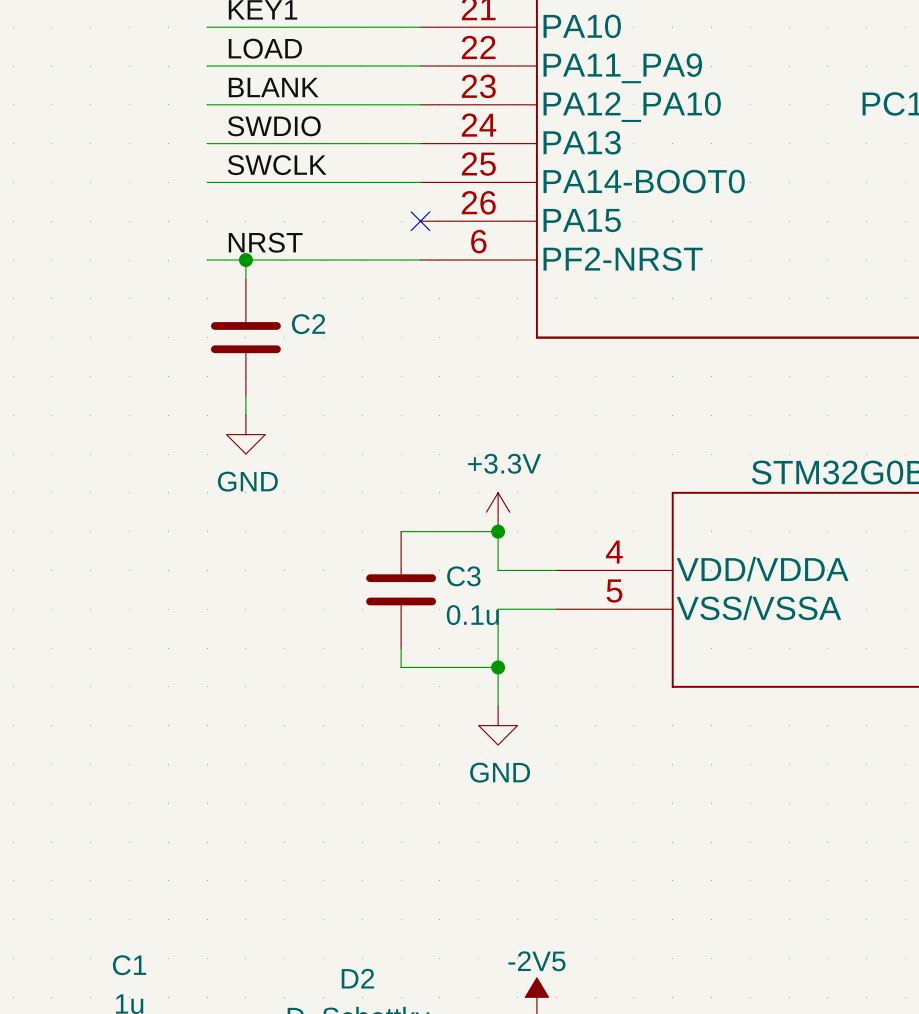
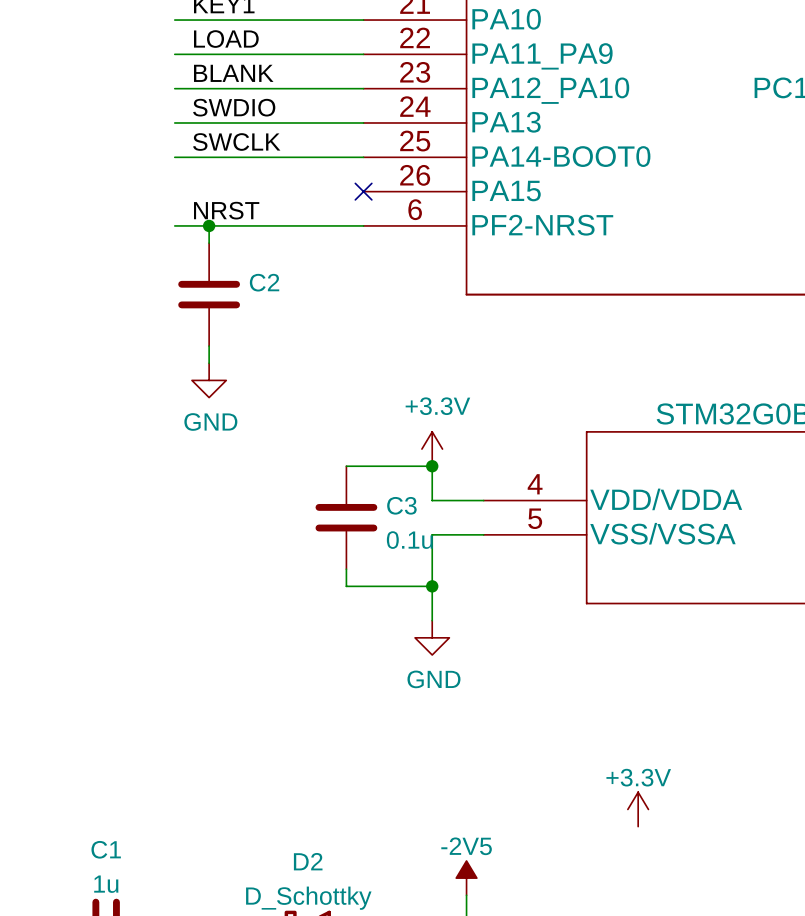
power symbol: none -> +3.3V (638, 809)

